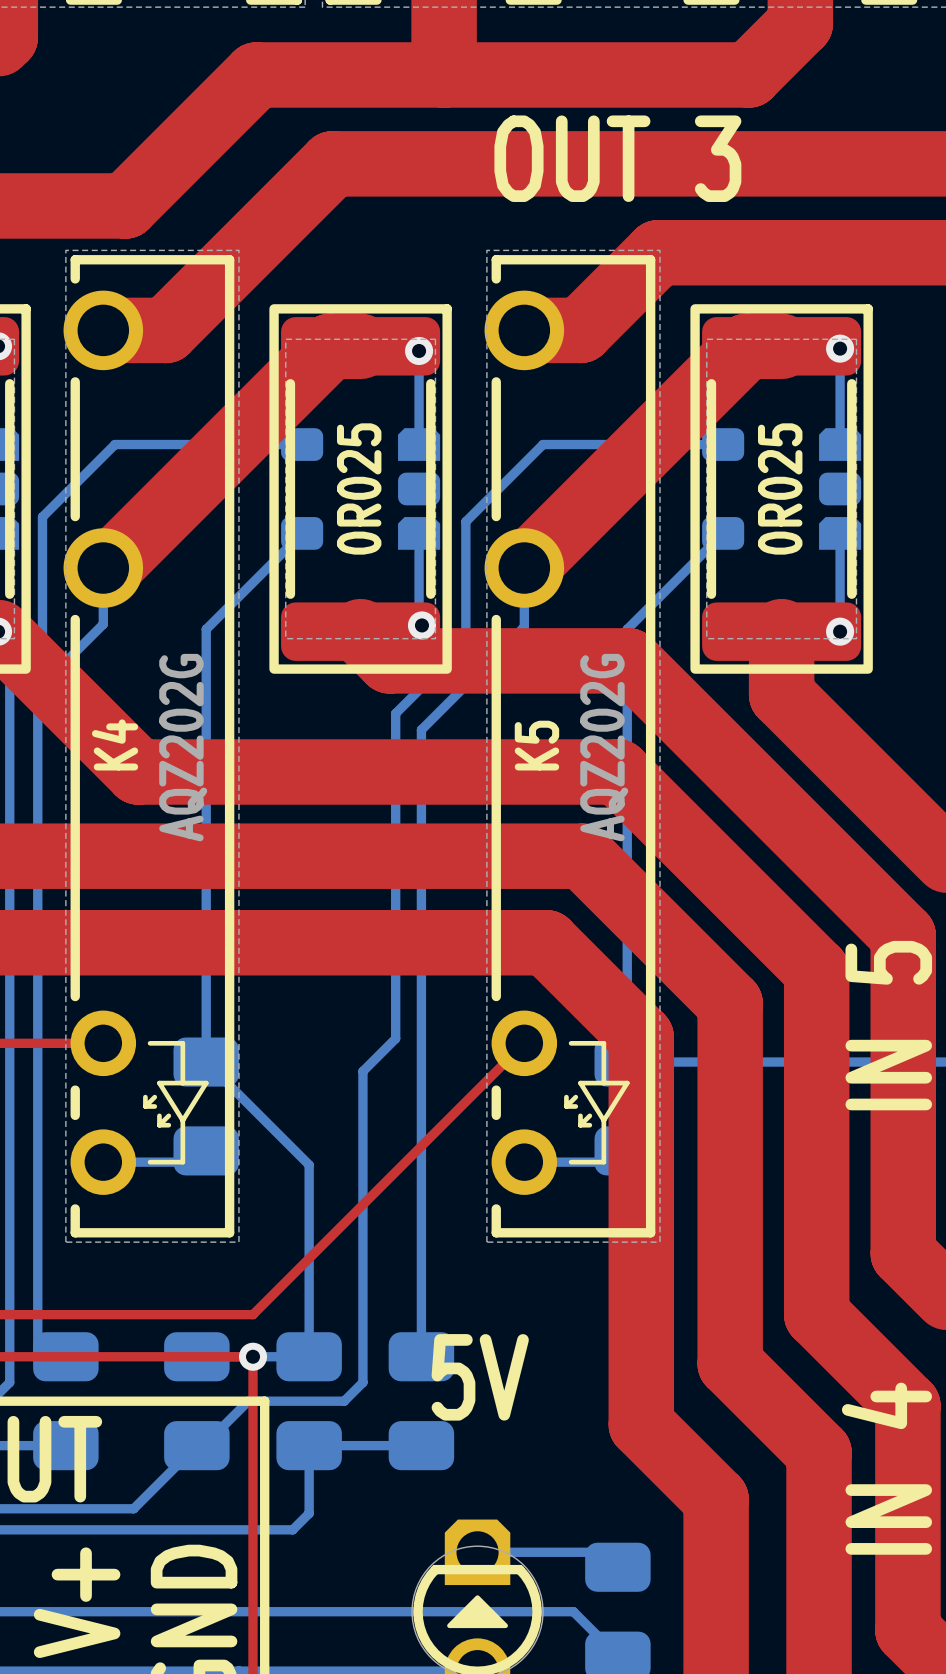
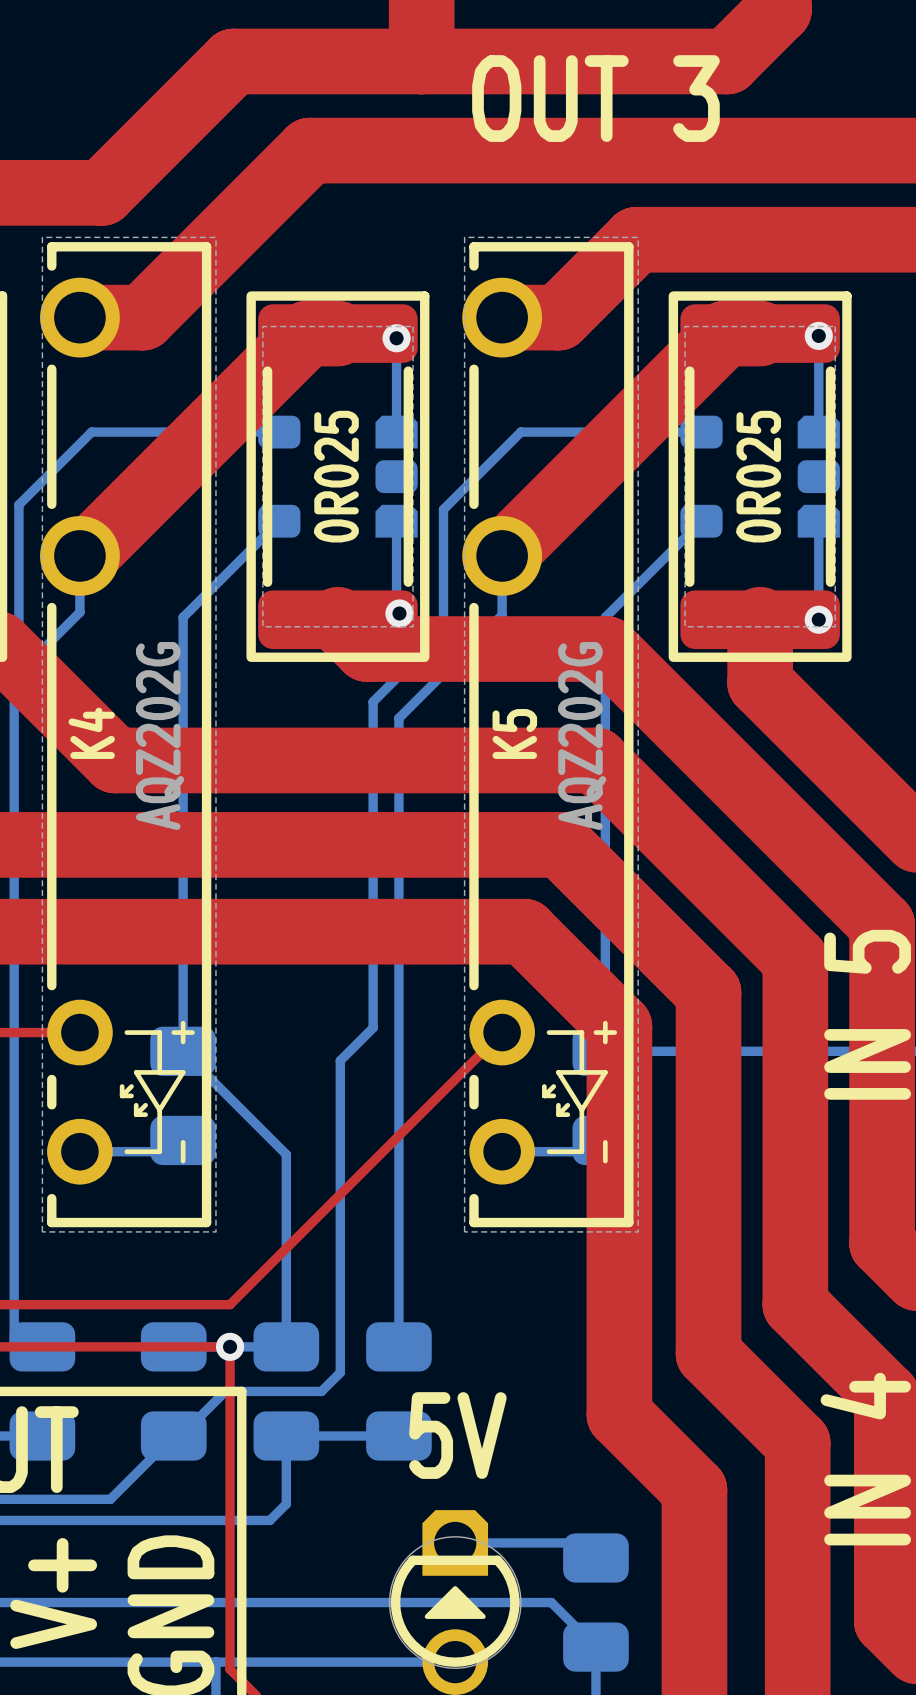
text position: OUT 3 (617, 158) -> OUT 3 (595, 98)
K4 footprint: [63, 250, 240, 1243] -> [40, 237, 217, 1233]
K5 footprint: [484, 250, 661, 1243] -> [462, 237, 639, 1233]
text position: 5V (480, 1377) -> 5V (457, 1435)

